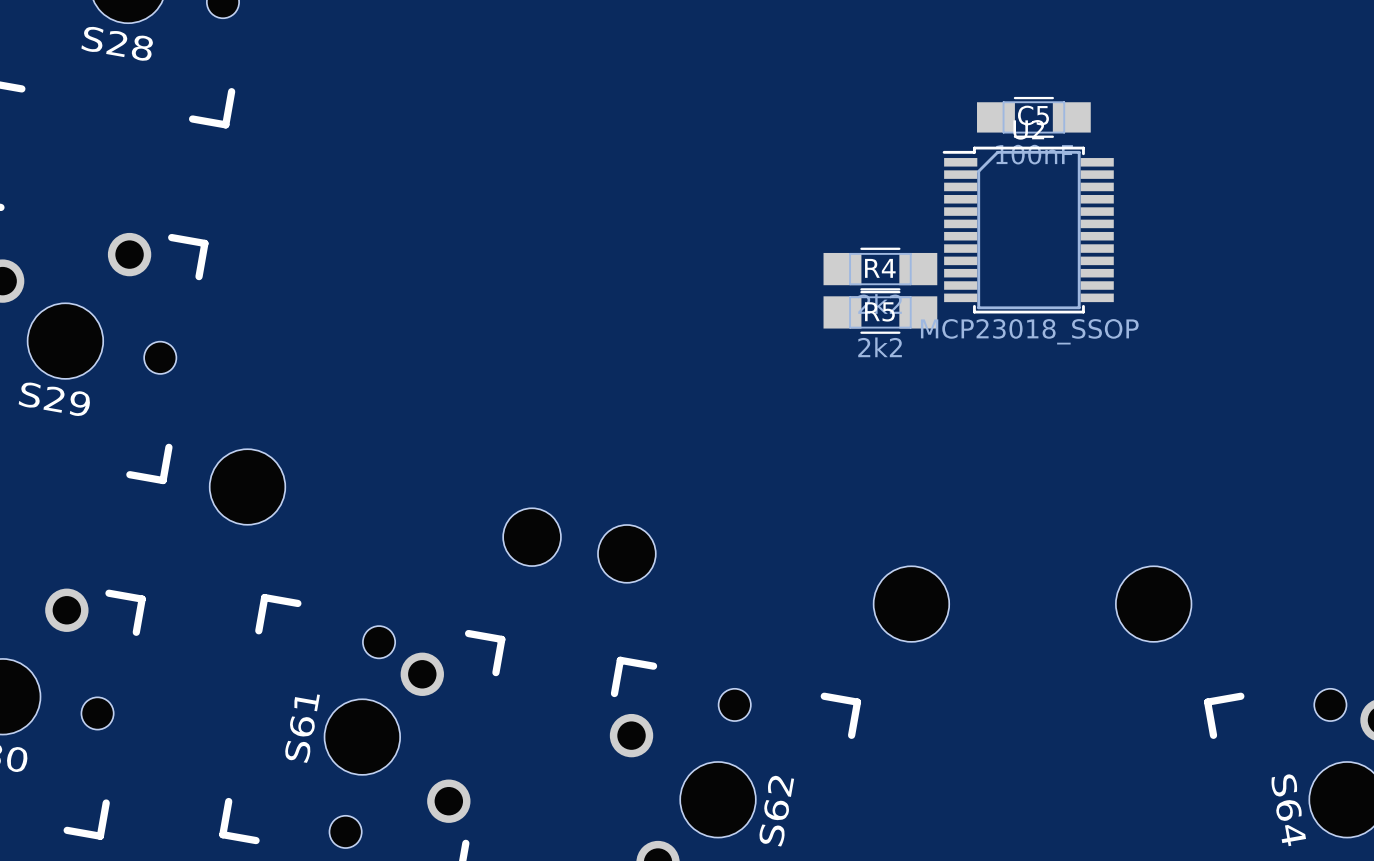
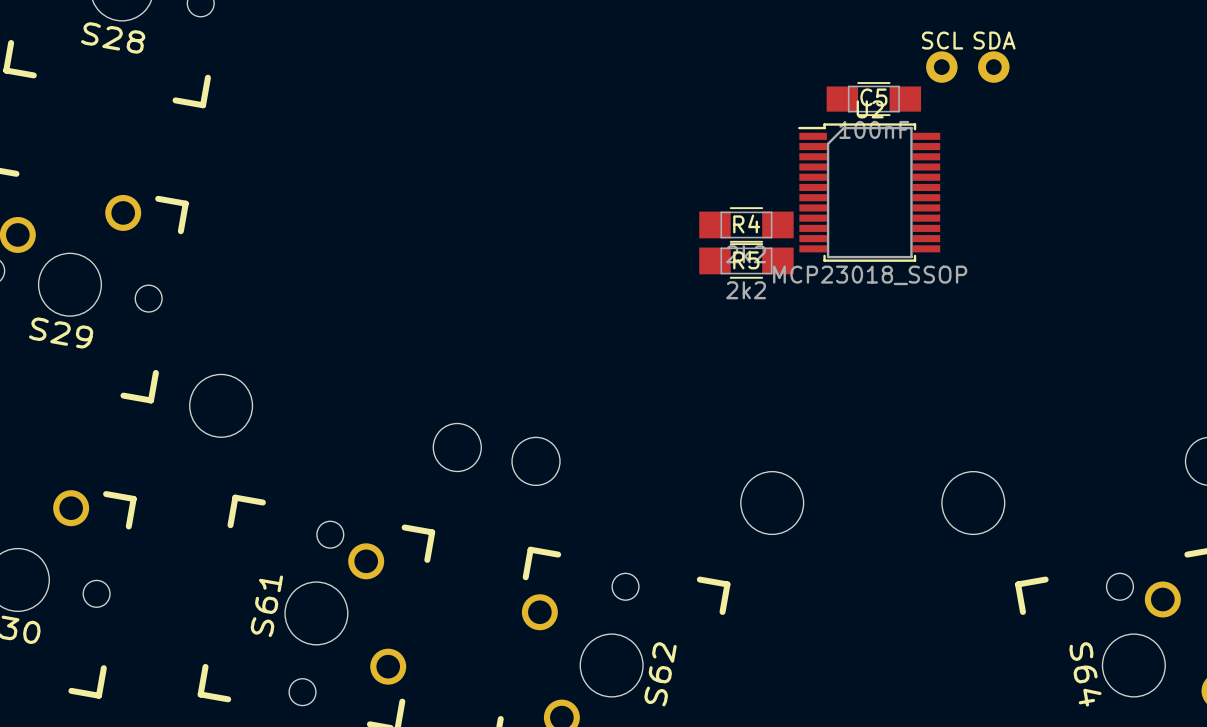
SCL: none -> (941, 67)
SDA: none -> (993, 67)

